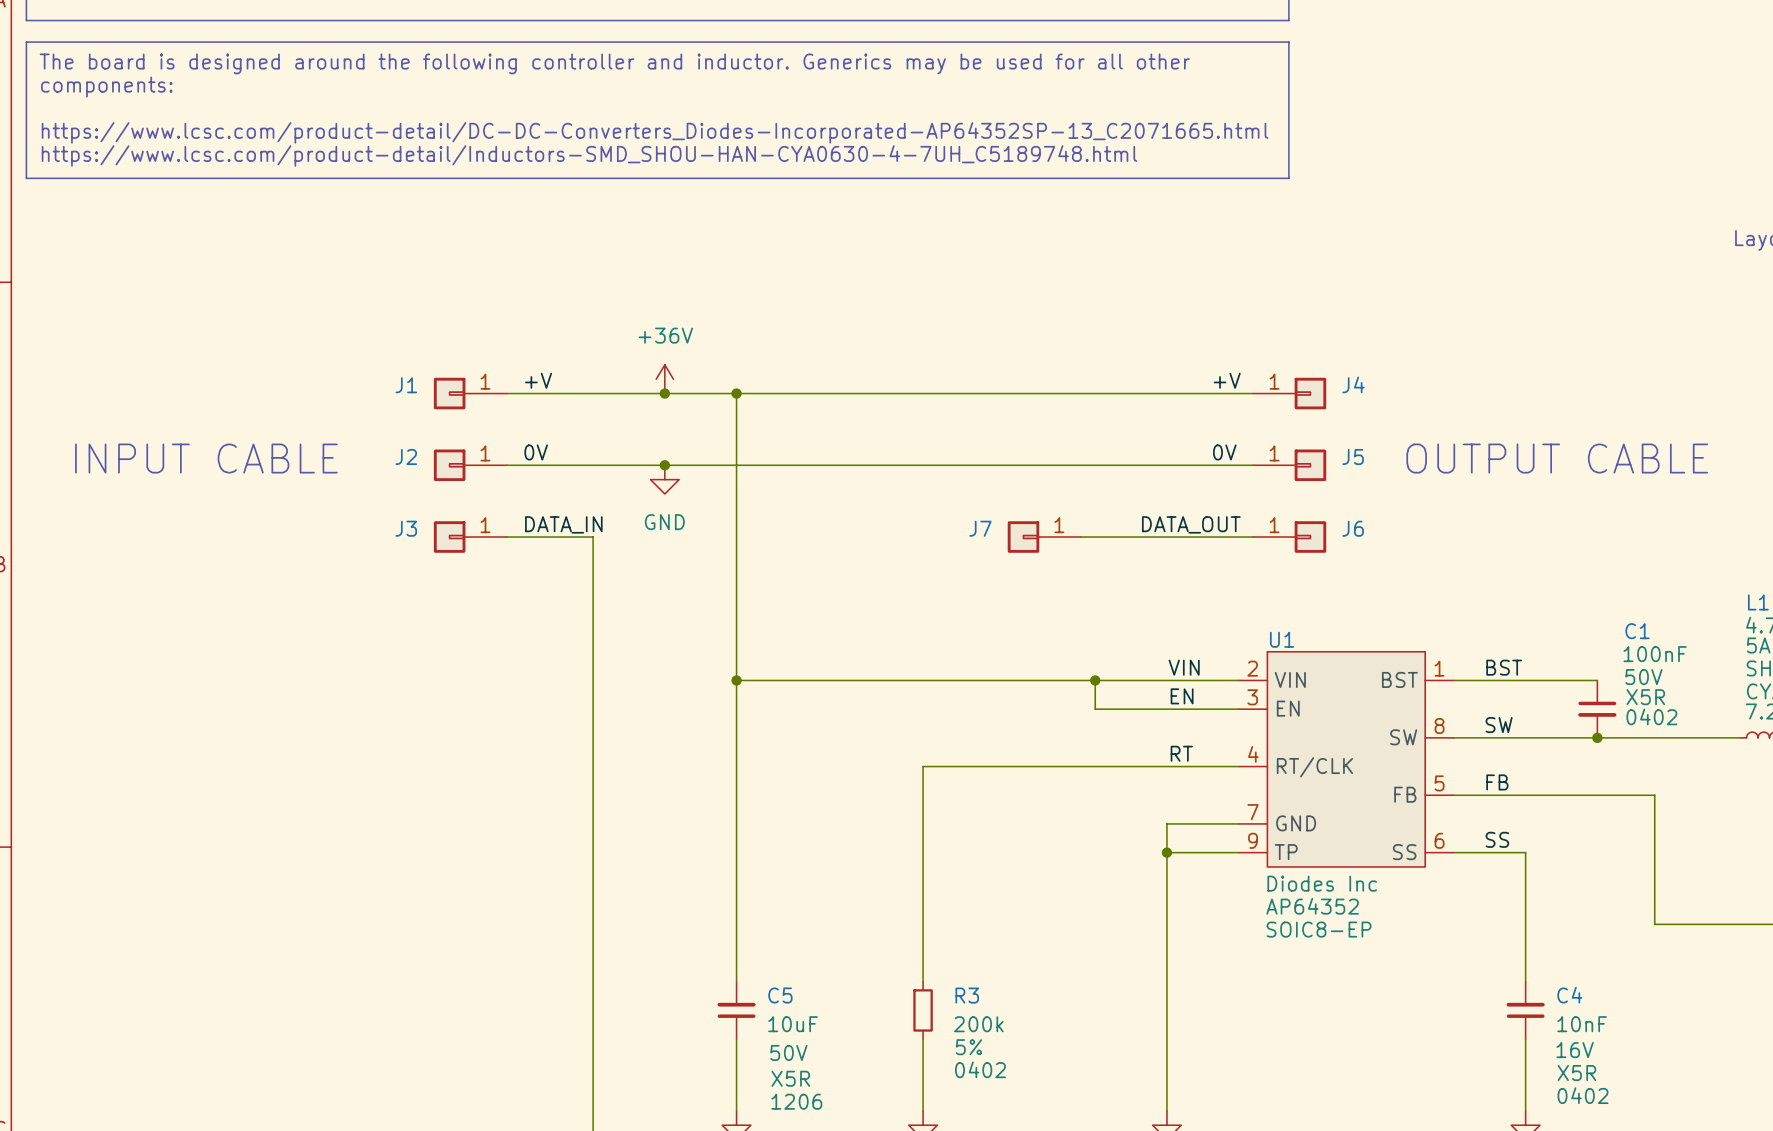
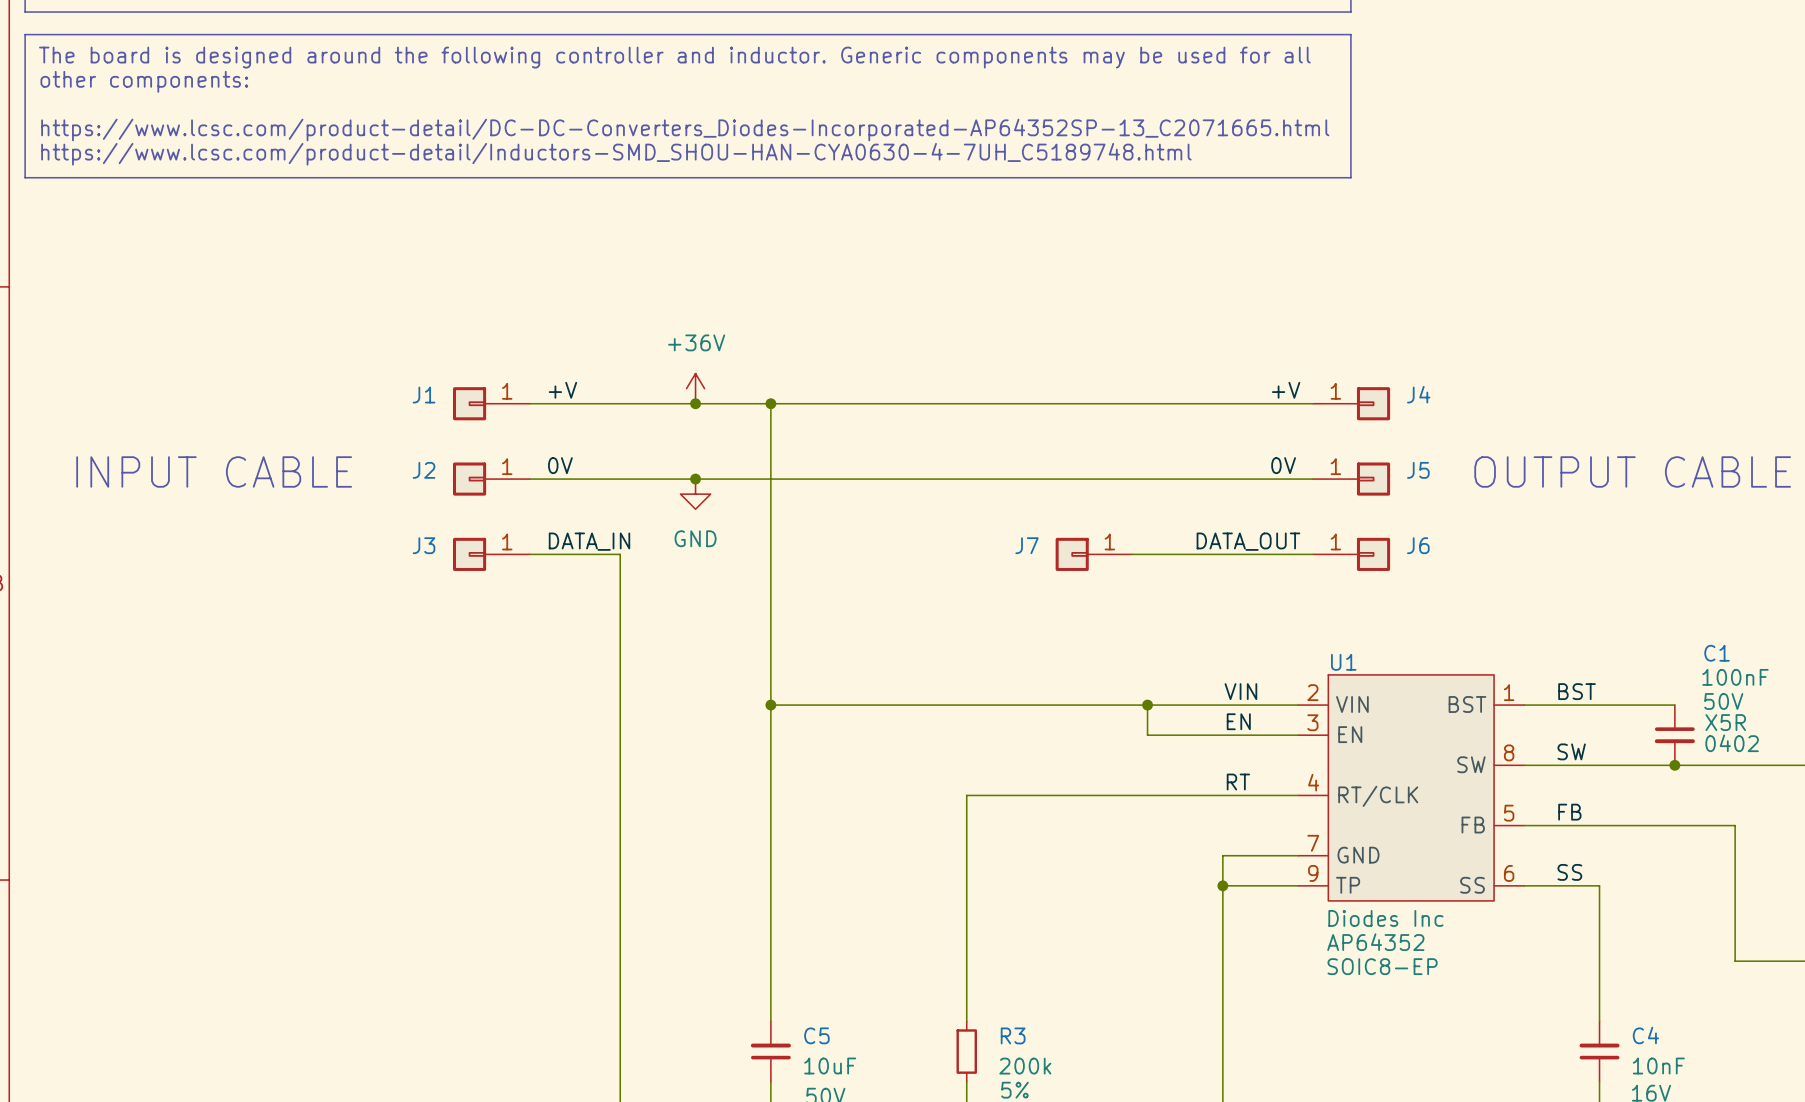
text: The board is designed around the following controller and inductor. Generics may be used for all other (614, 63) -> The board is designed around the following controller and inductor. Generic components may be used for all (674, 57)
text: components: (106, 87) -> other components: (144, 81)

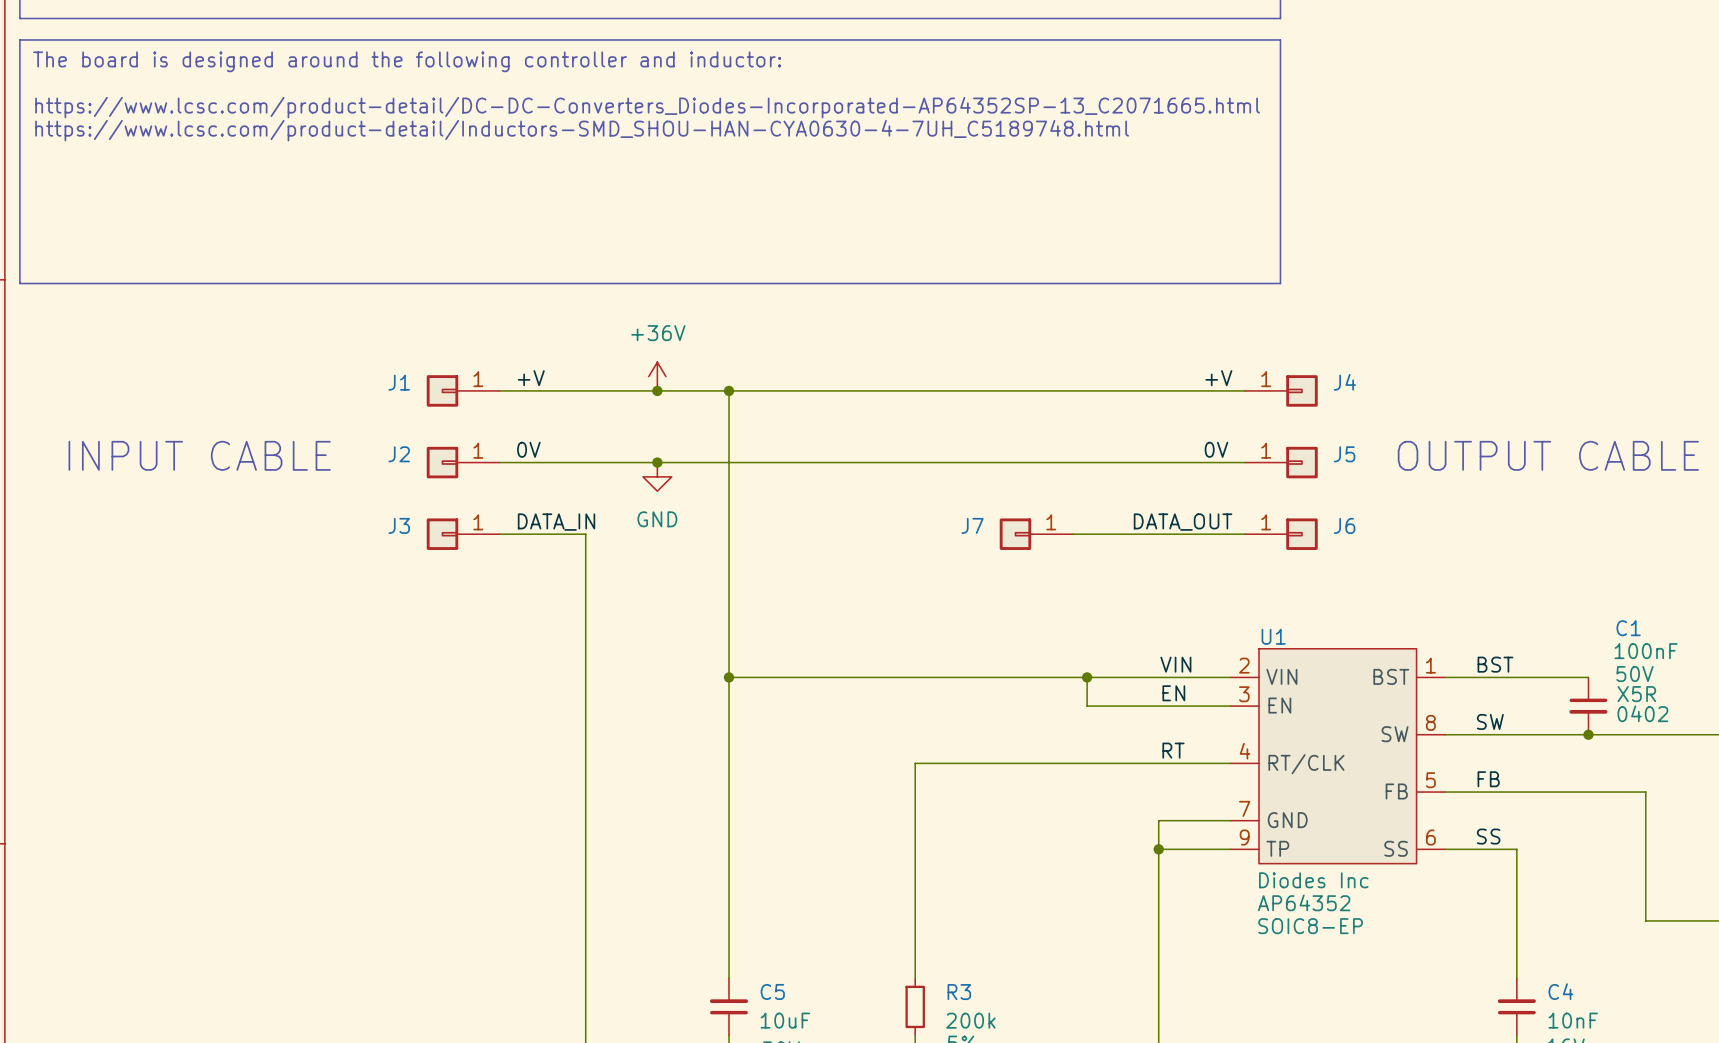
text: The board is designed around the following controller and inductor. Generic components may be used for all (674, 57) -> The board is designed around the following controller and inductor: (407, 61)
text: other components: (144, 81) -> none
text: none -> https://www.lcsc.com/product-detail/DC-DC-Converters_Diodes-Incorporated-AP64352SP-13_C2071665.html (647, 107)
text: https://www.lcsc.com/product-detail/DC-DC-Converters_Diodes-Incorporated-AP64352SP-13_C2071665.html (685, 129) -> https://www.lcsc.com/product-detail/Inductors-SMD_SHOU-HAN-CYA0630-4-7UH_C5189748.html (582, 130)
text: https://www.lcsc.com/product-detail/Inductors-SMD_SHOU-HAN-CYA0630-4-7UH_C5189748.html (616, 154) -> none
line: (25, 177) (1350, 177) -> (19, 176) (19, 283) (1280, 283) (1280, 176)

